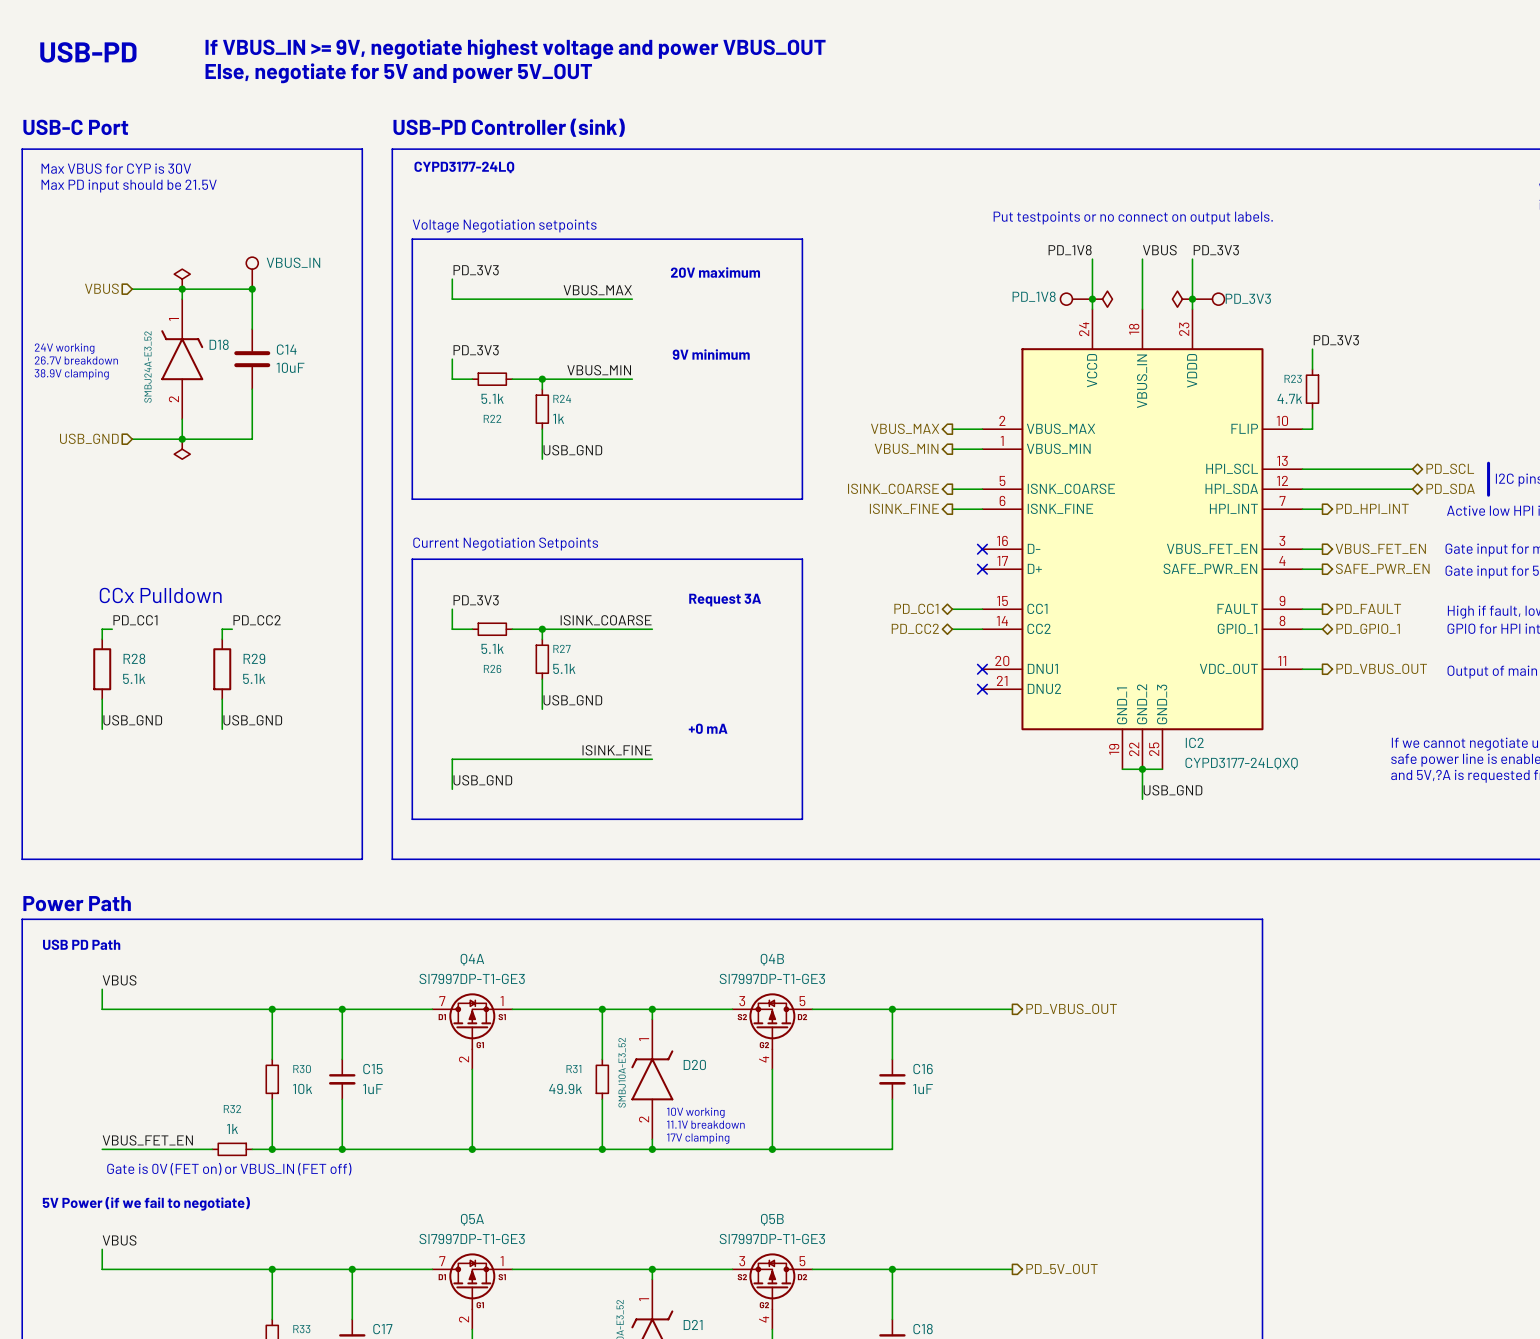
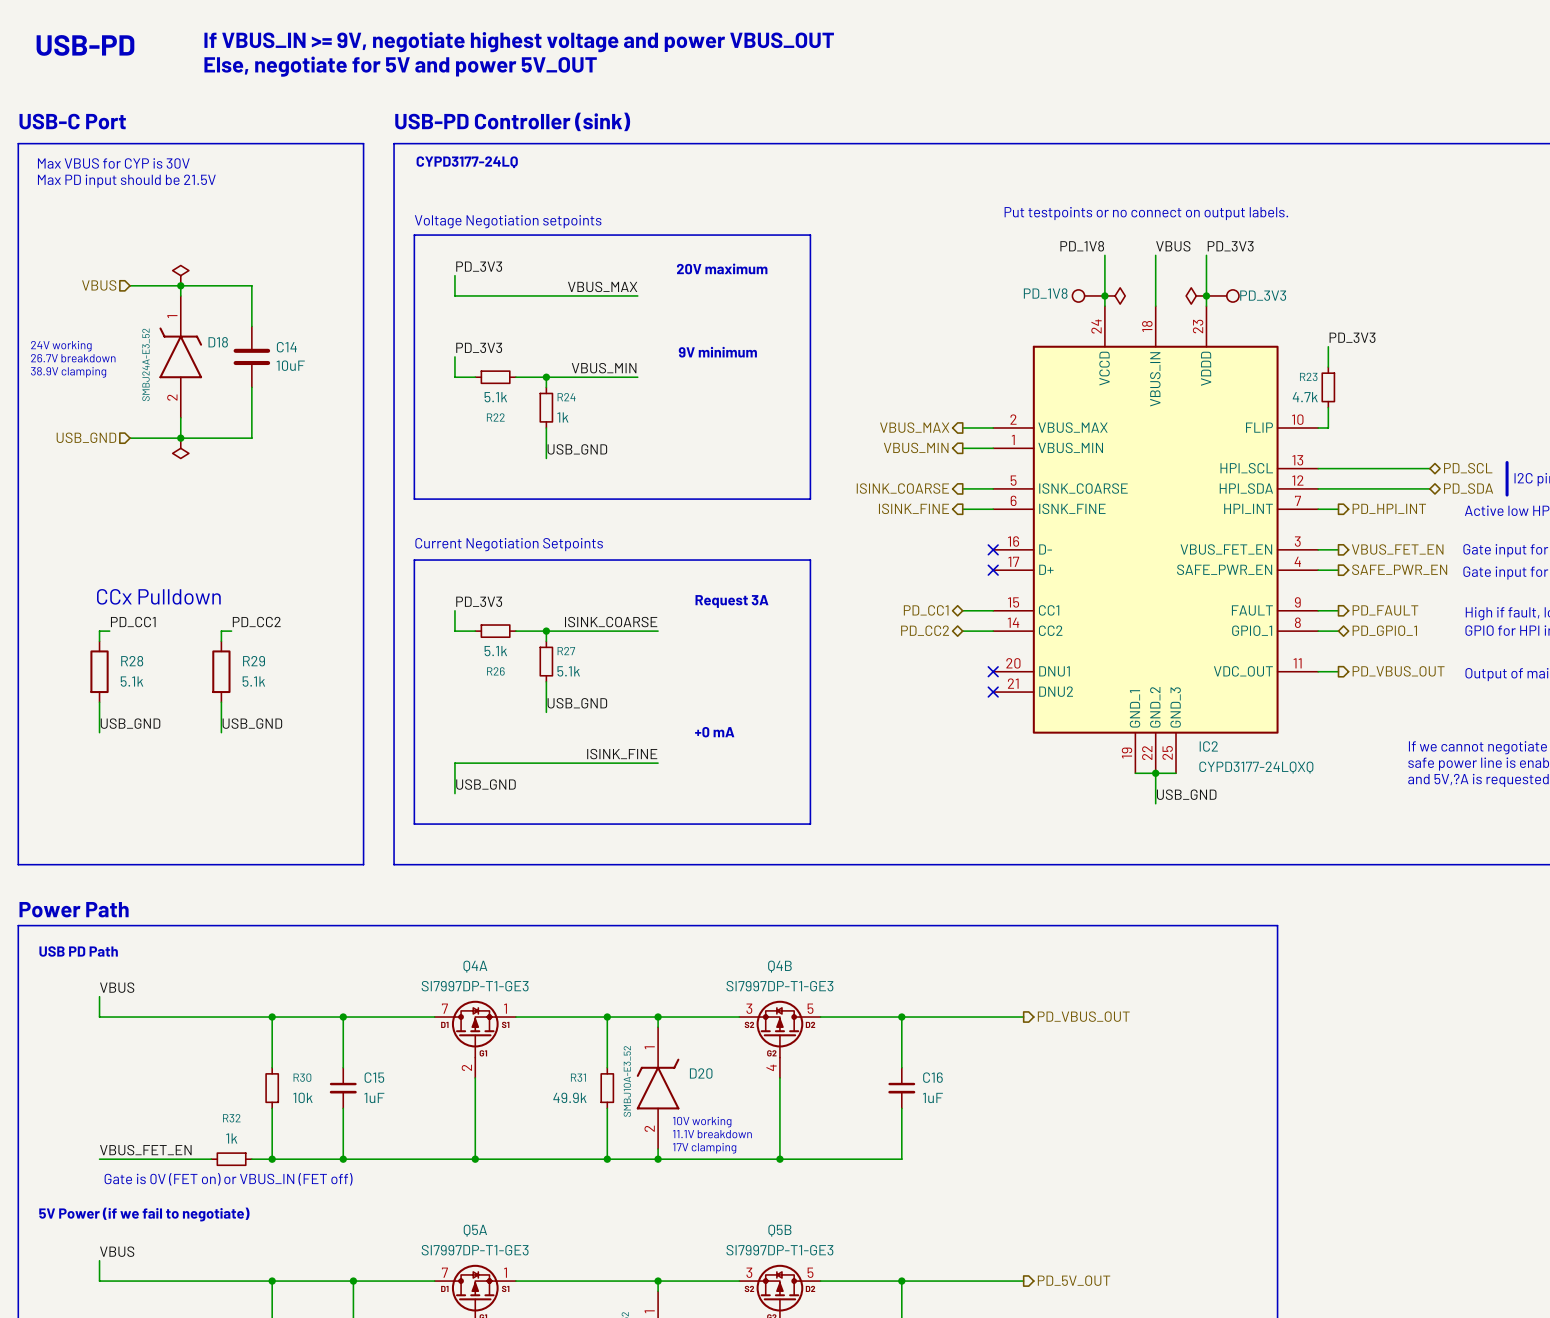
part: VBUS_IN (252, 273) -> none
junction: (252, 289) -> none

